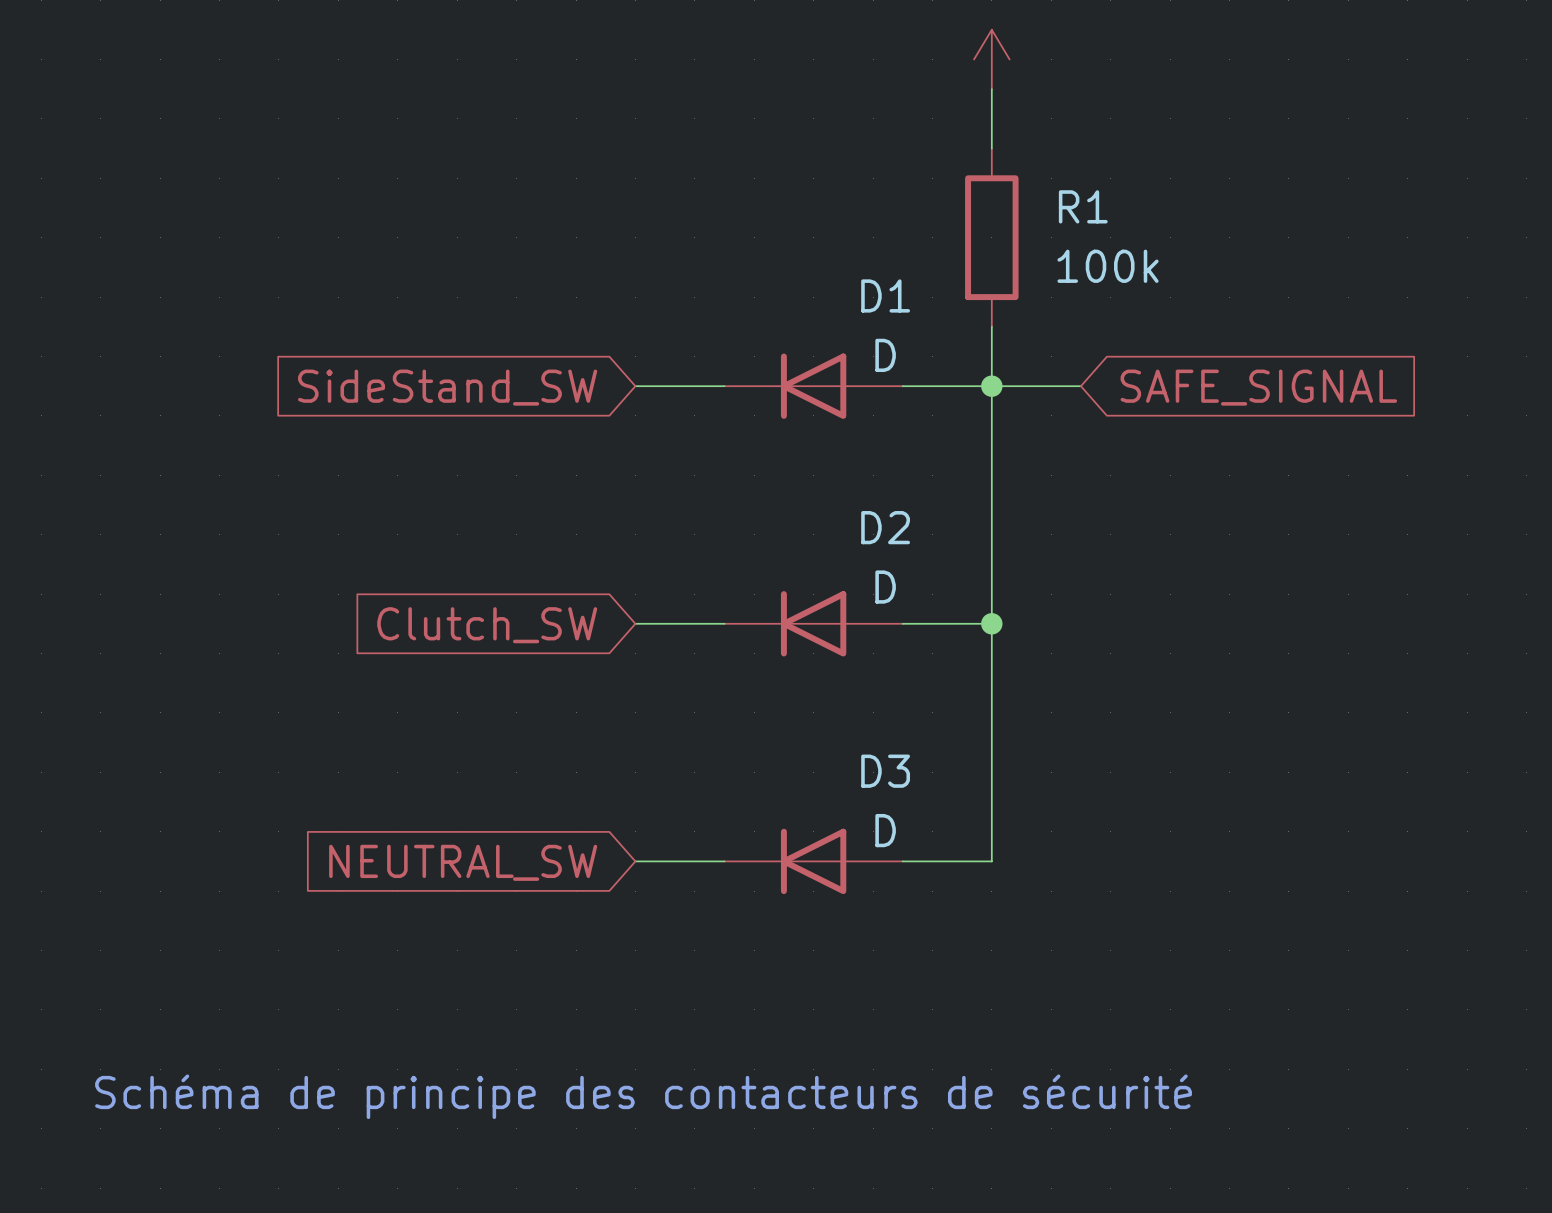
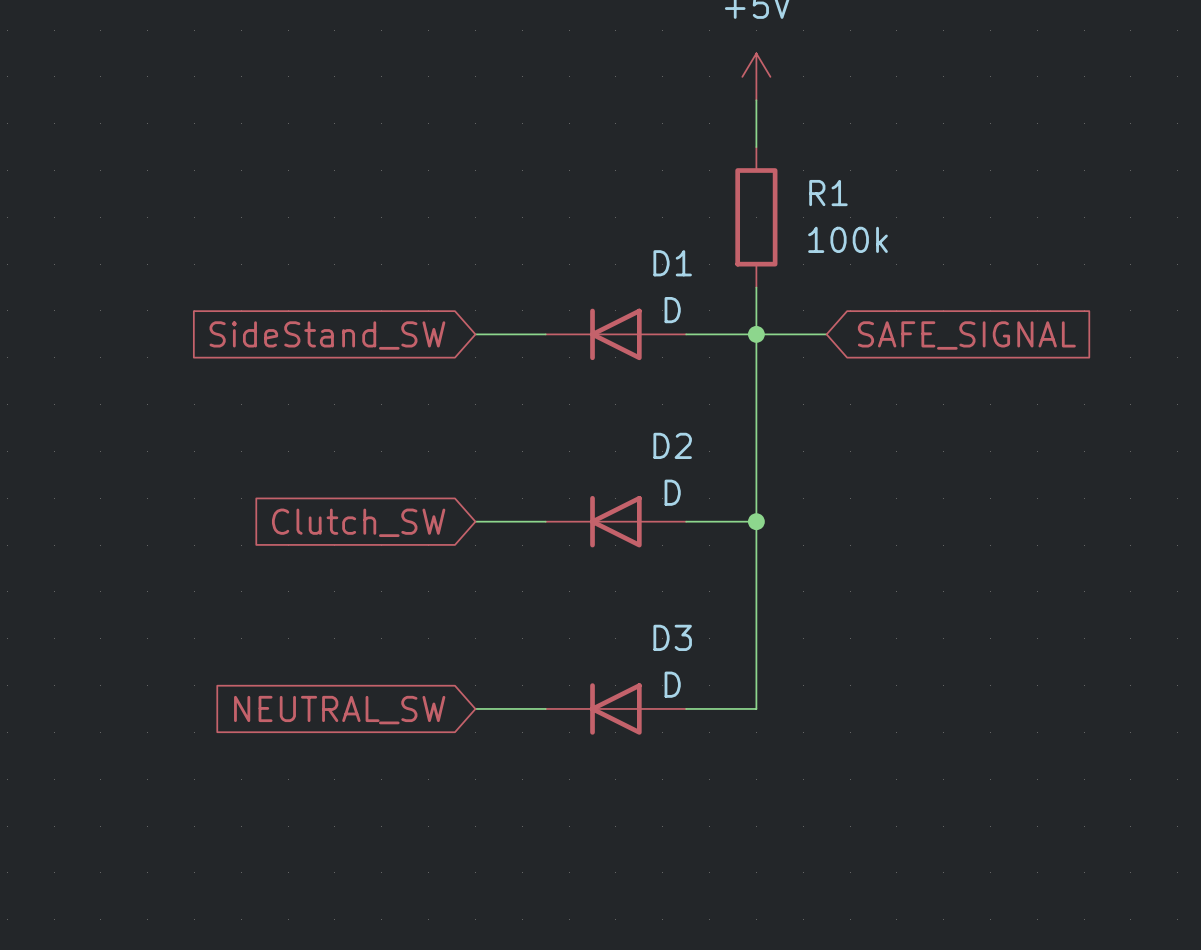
text: Schéma de principe des contacteurs de sécurité (643, 1096) -> none

